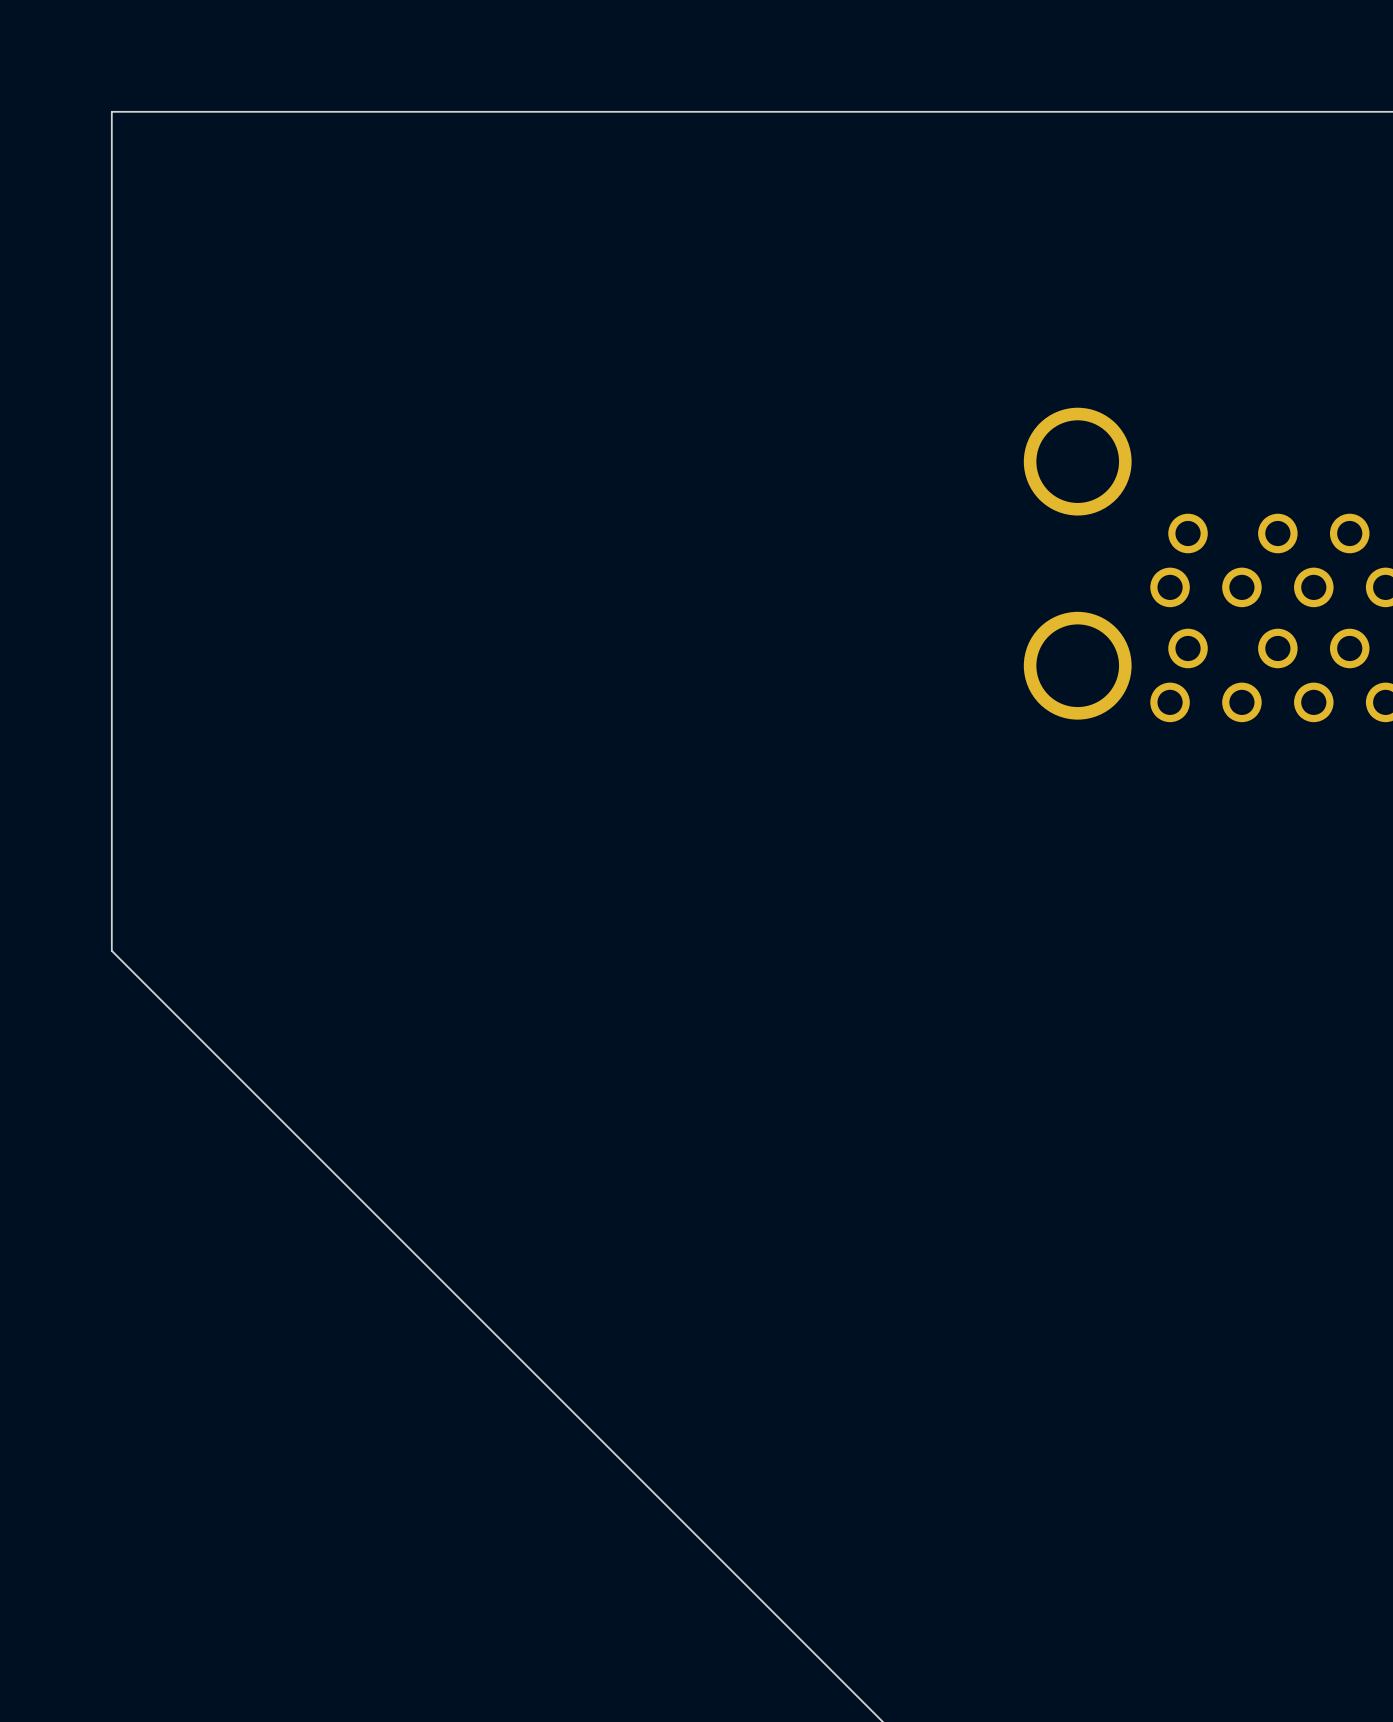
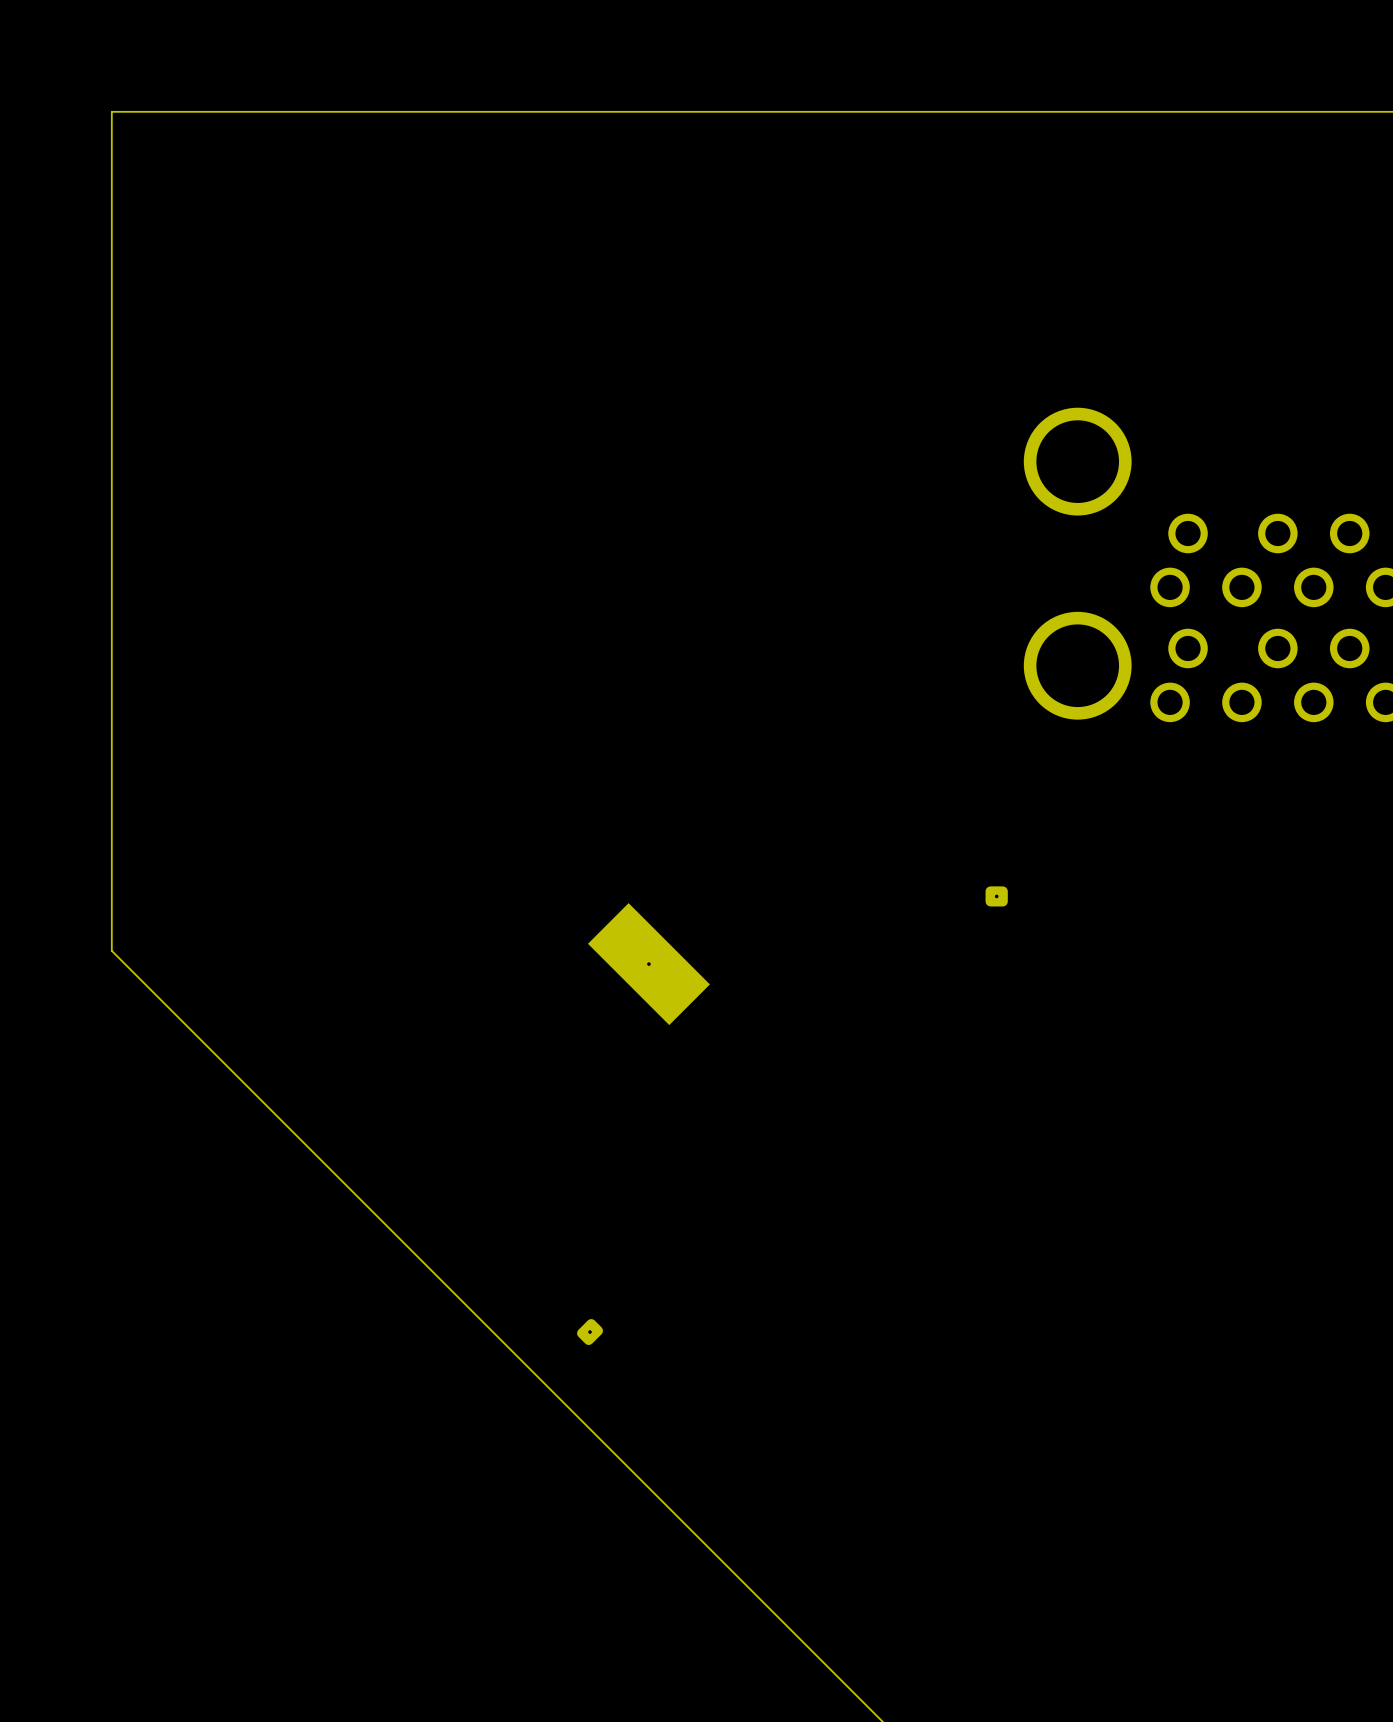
part: none -> (996, 896)
part: none -> (648, 964)
part: none -> (590, 1332)

